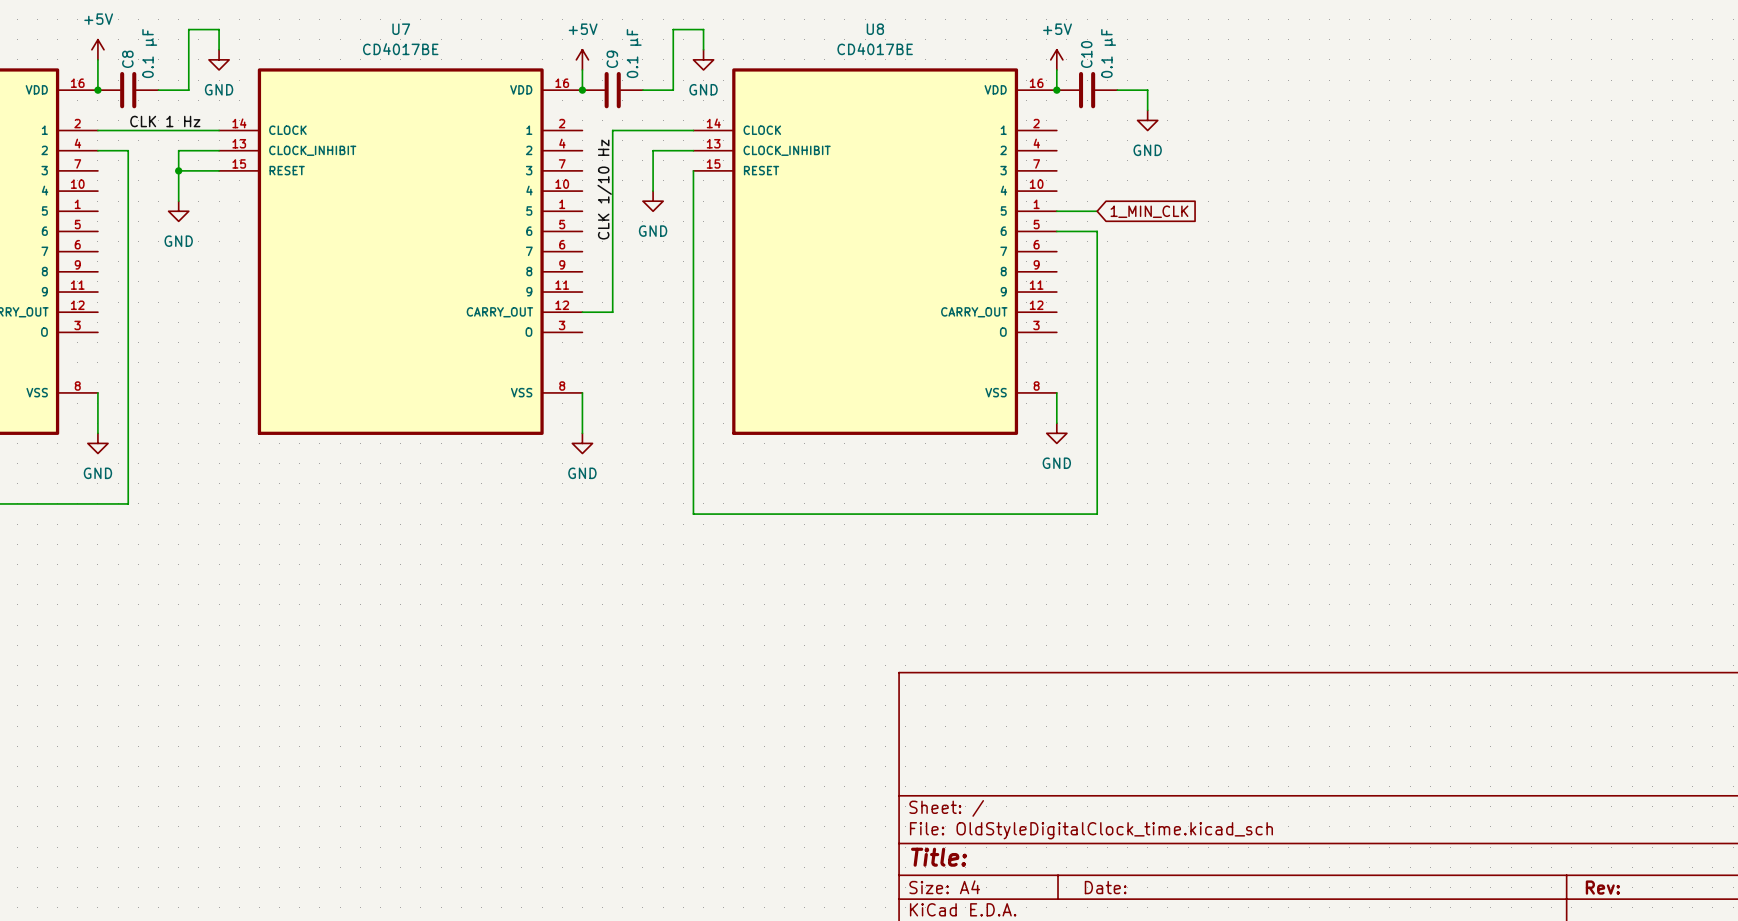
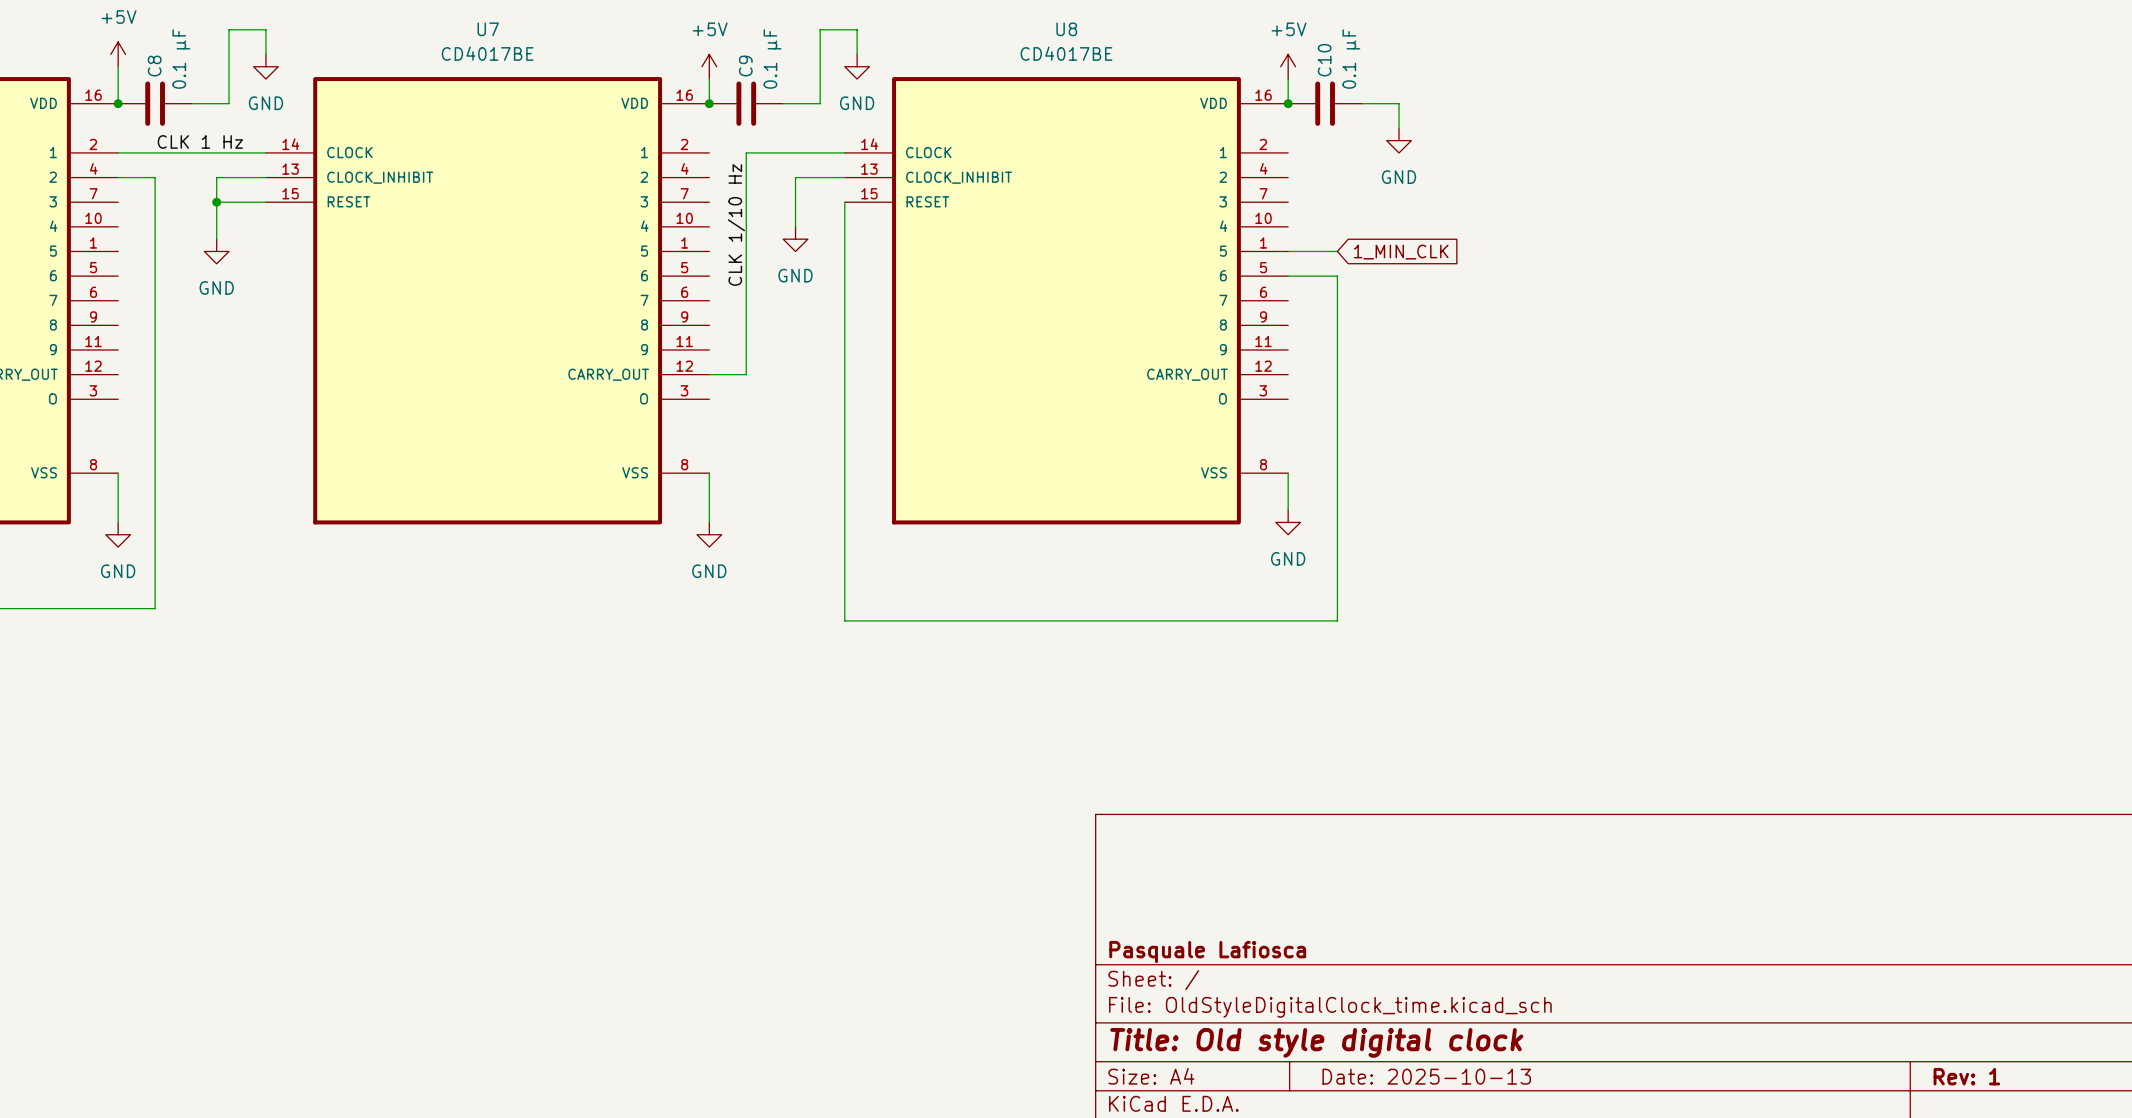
title block: none -> Pasquale Lafiosca (1207, 952)
title block: Title: (939, 857) -> Title: Old style digital clock (1316, 1042)
title block: Date: (1105, 887) -> Date: 2025-10-13 (1426, 1076)
title block: Rev: (1602, 887) -> Rev: 1 (1966, 1076)

